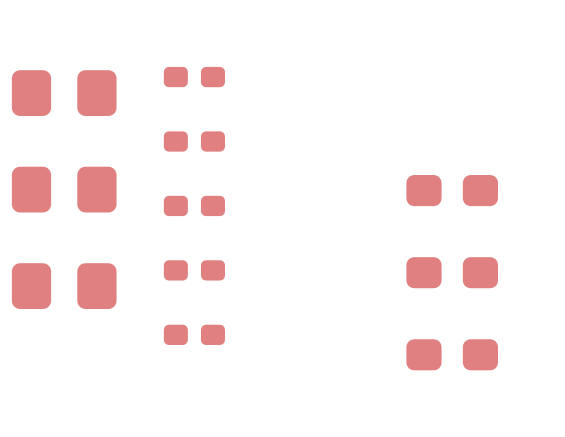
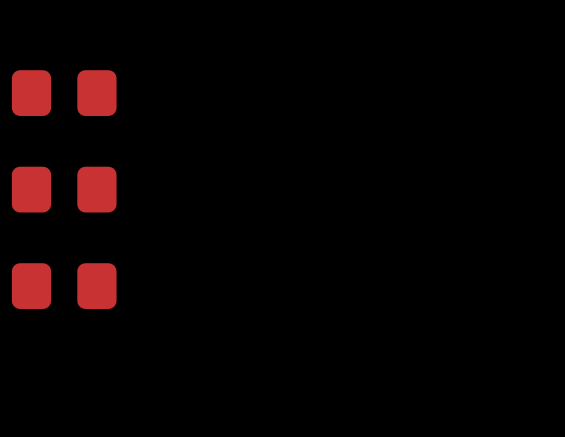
part: (194, 77) -> none
part: (194, 141) -> none
part: (452, 190) -> none
part: (194, 205) -> none
part: (194, 270) -> none
part: (452, 272) -> none
part: (194, 334) -> none
part: (452, 354) -> none

